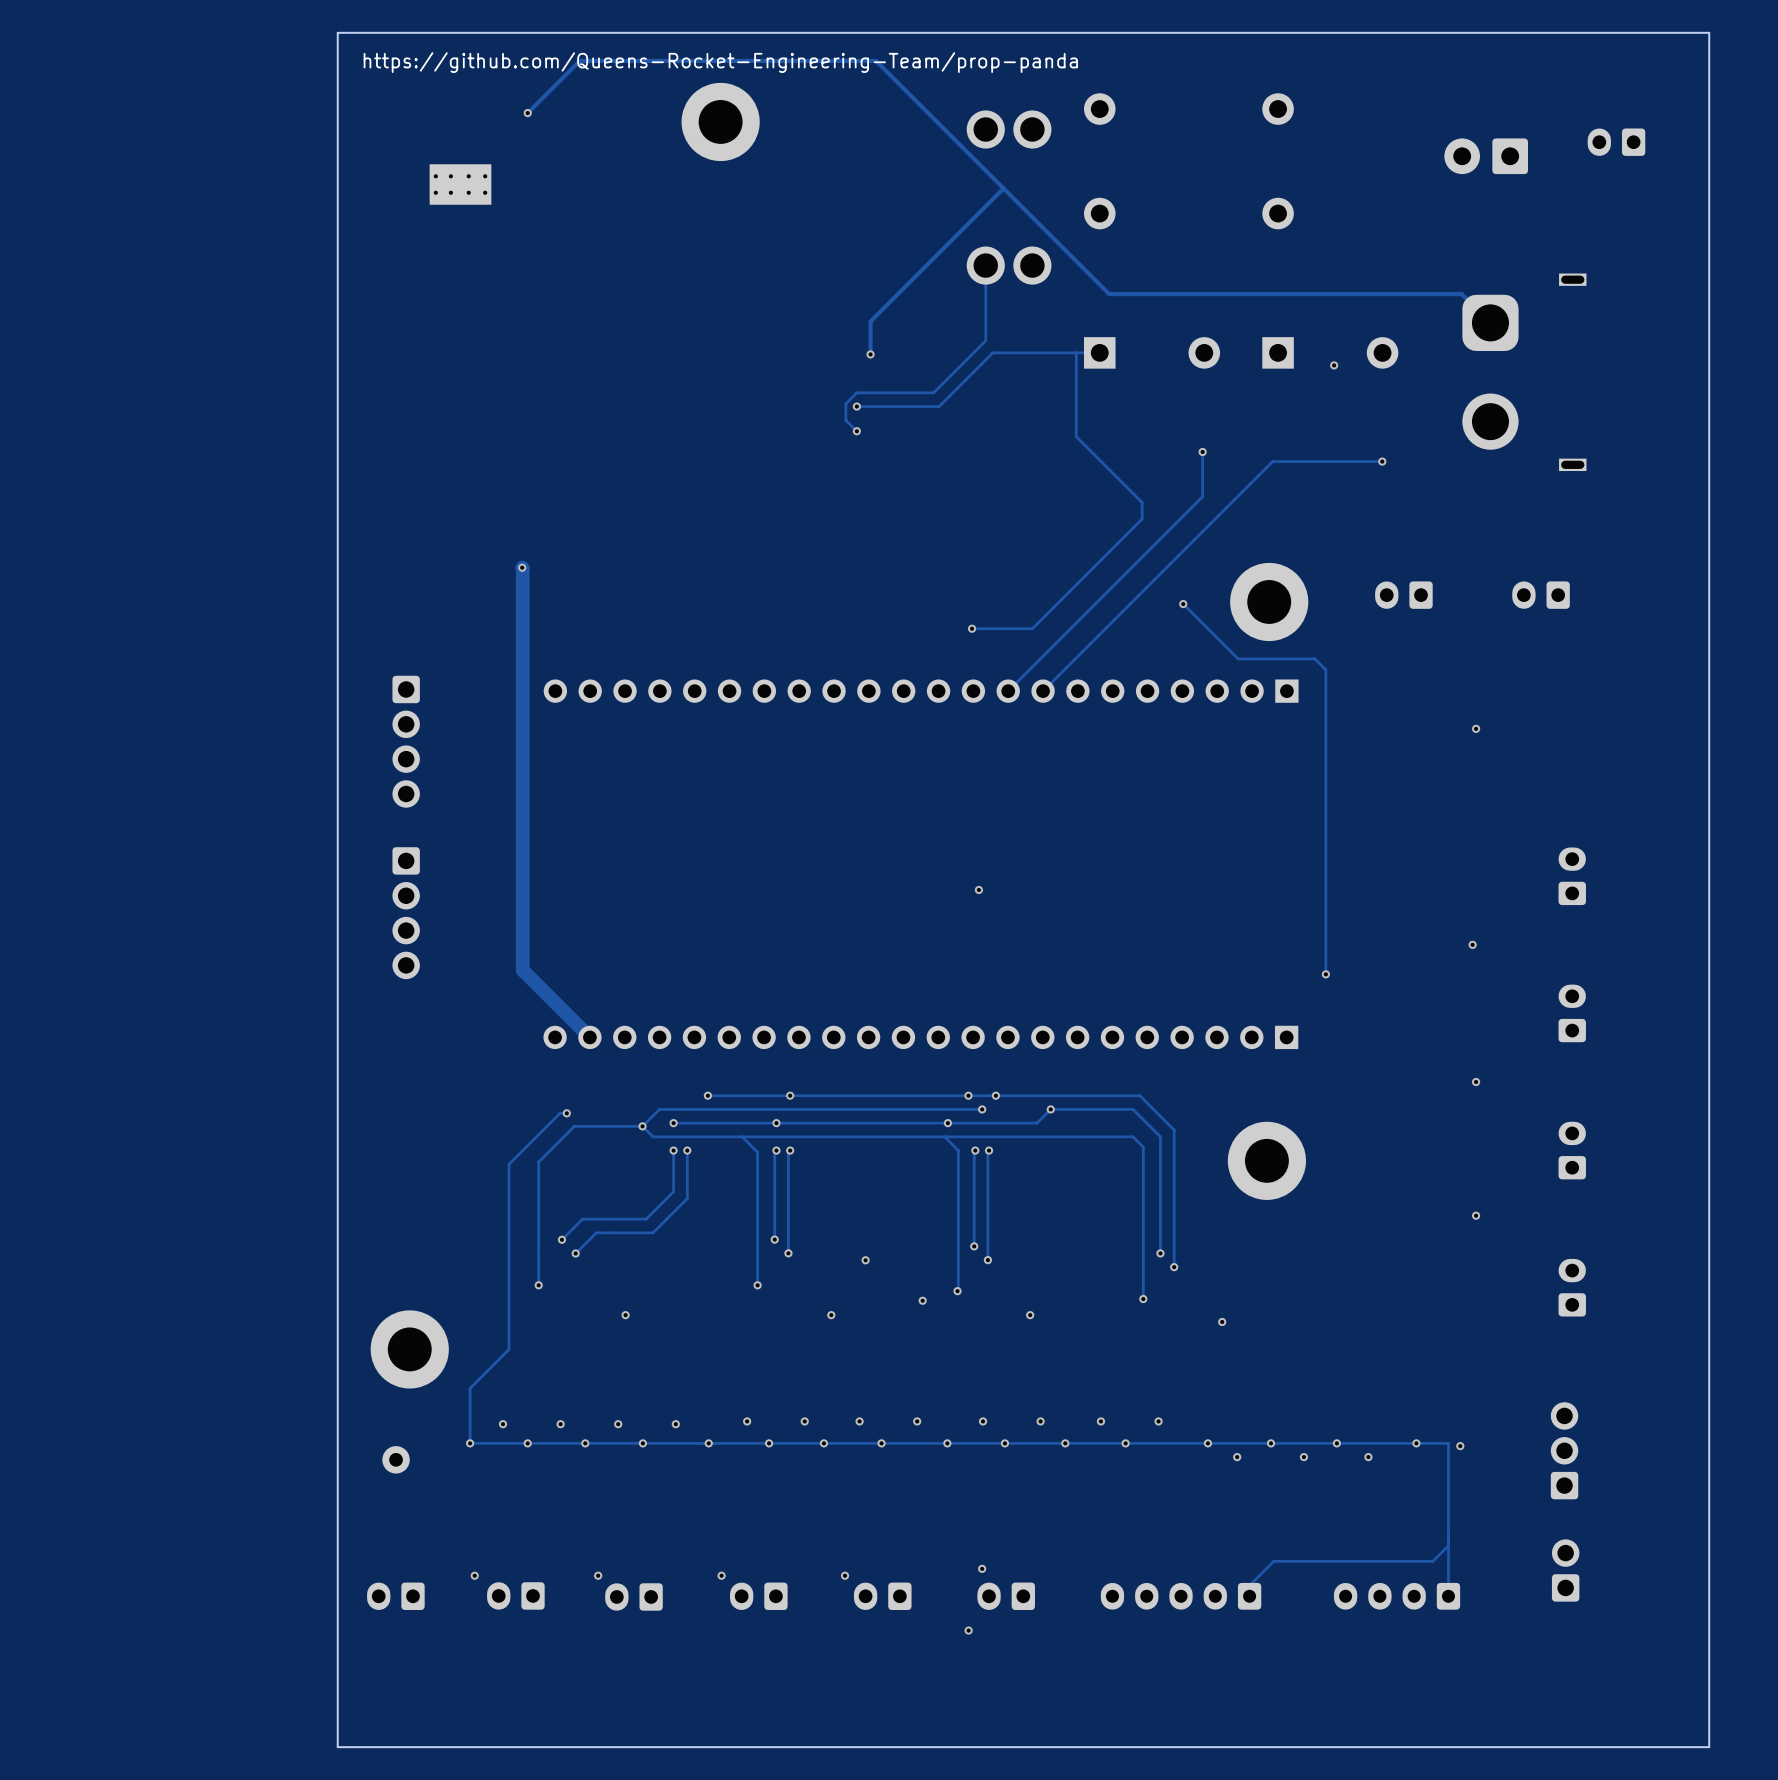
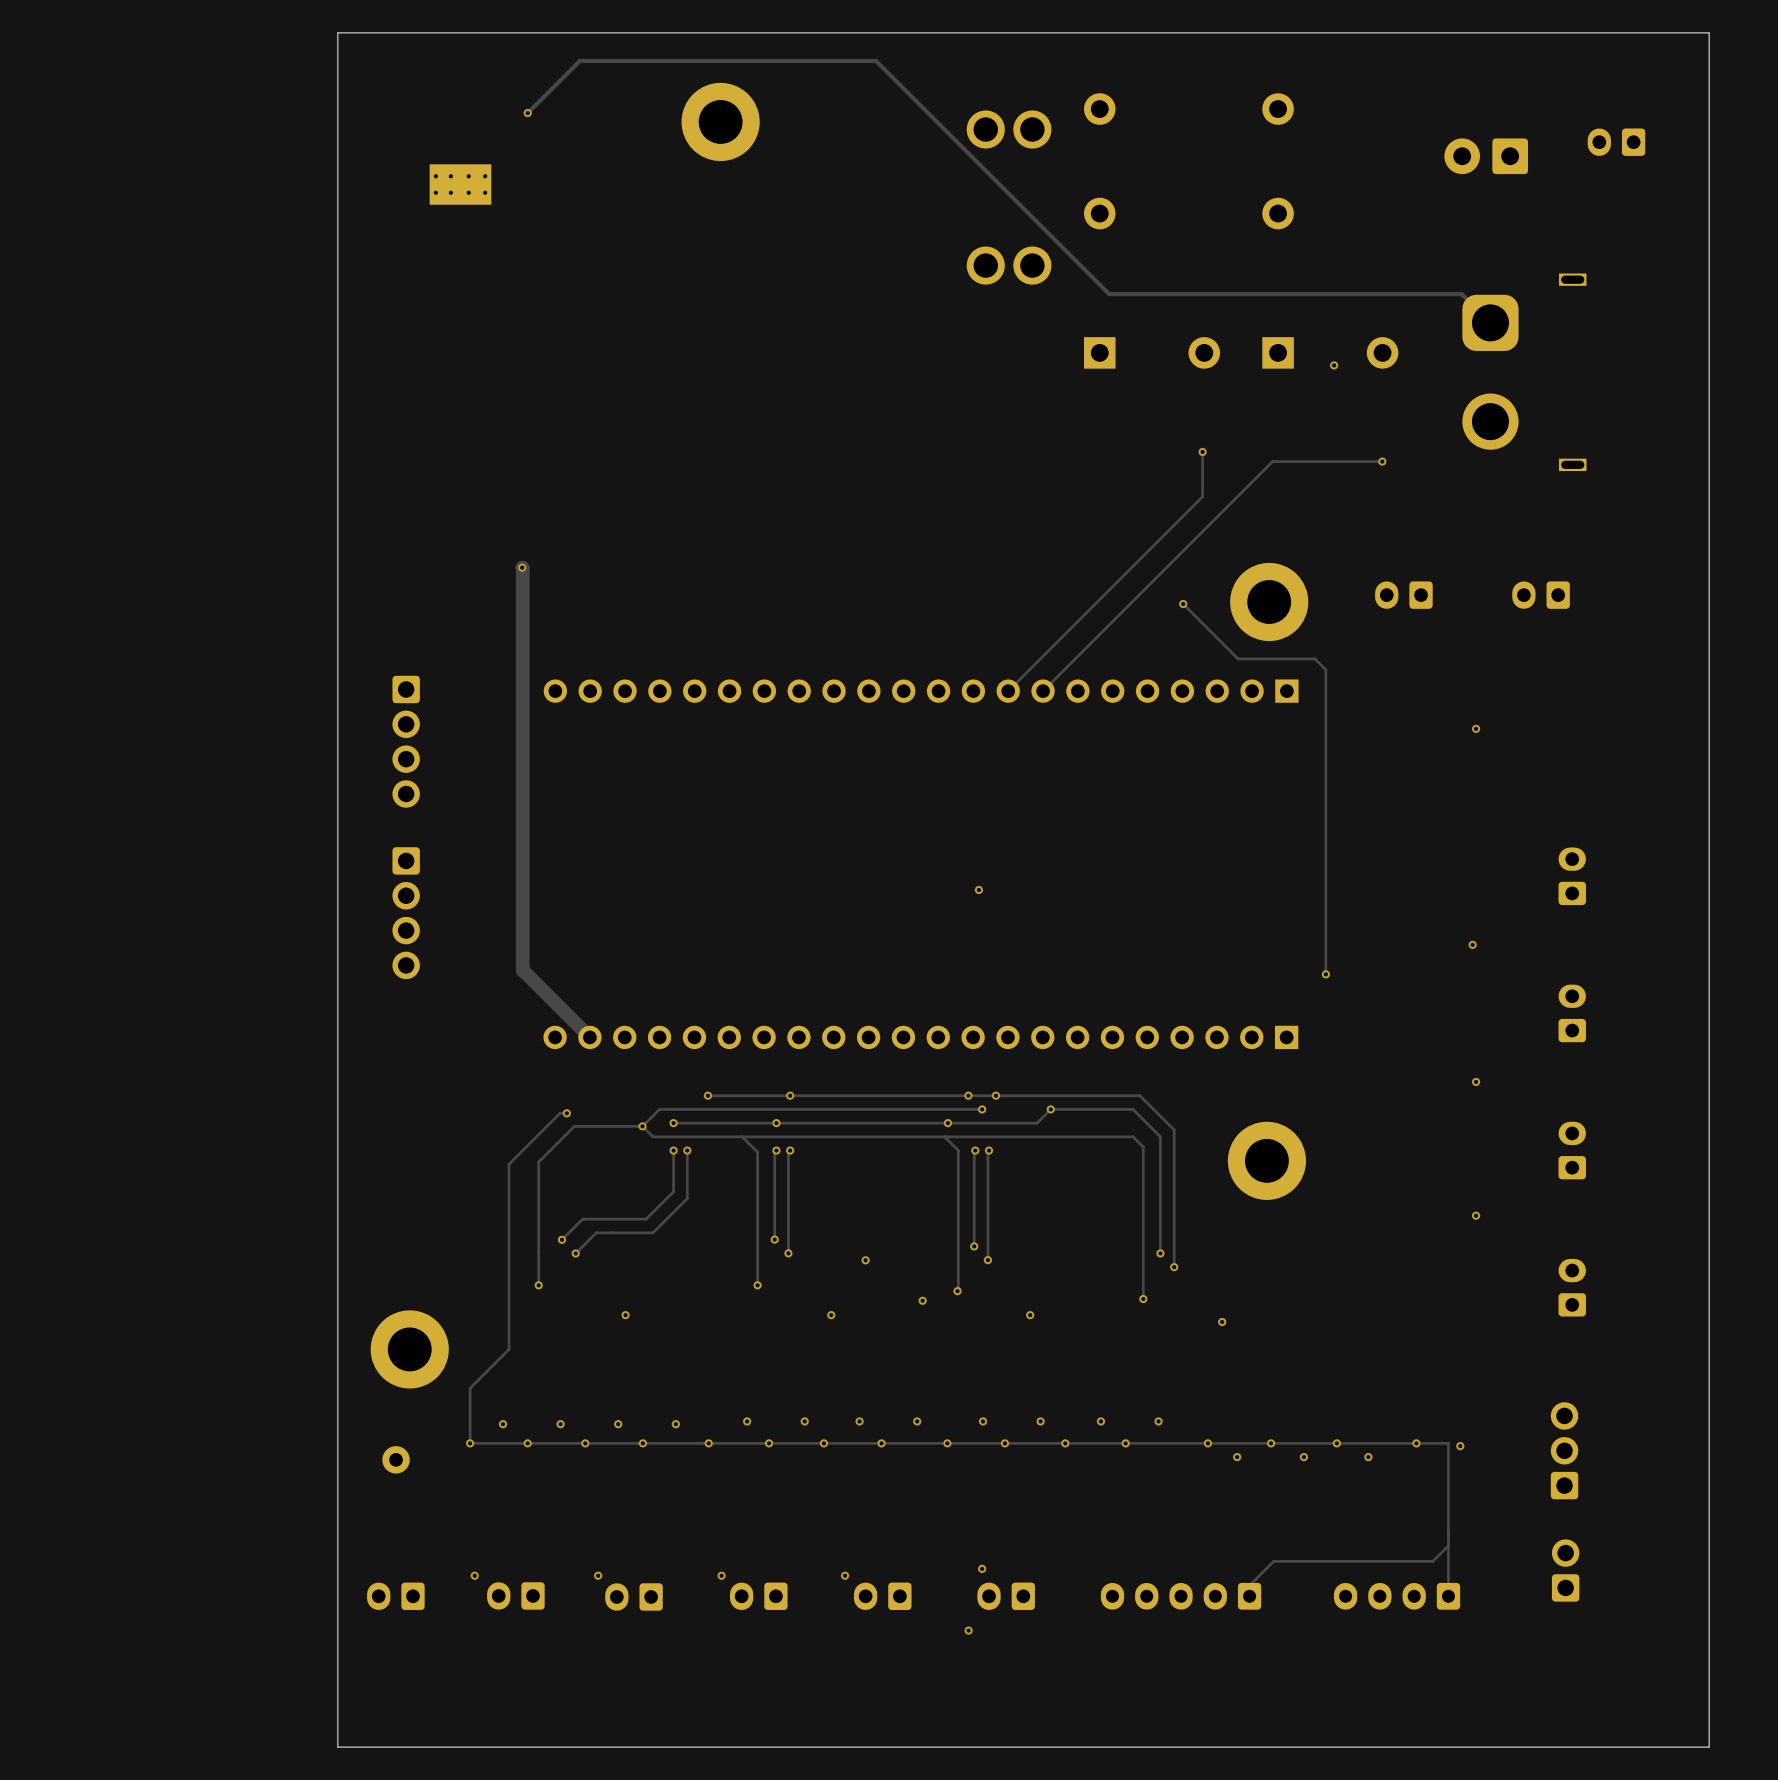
text: https://github.com/Queens-Rocket-Engineering-Team/prop-panda (720, 62) -> none
track: (1003, 188) (870, 321) (870, 354) -> none
track: (985, 265) (985, 340) (933, 392) (856, 392) (845, 403) (845, 420) (856, 431) -> none
track: (1076, 352) (1076, 436) (1142, 502) (1142, 519) (1032, 628) (972, 628) -> none
track: (1099, 352) (992, 352) (939, 406) (856, 406) -> none
via: (870, 354) -> none
via: (856, 406) -> none
via: (856, 431) -> none
via: (972, 628) -> none

